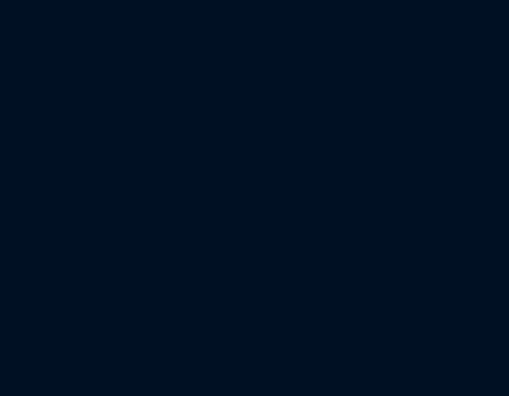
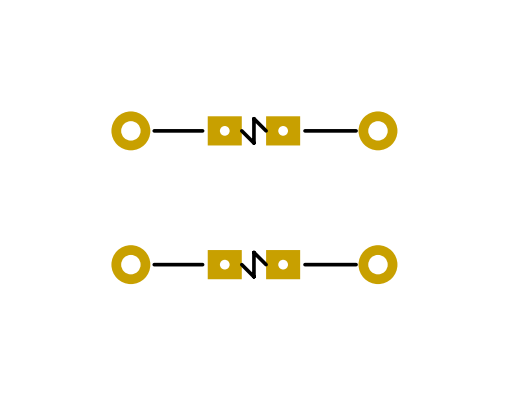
part: none -> (254, 130)
part: none -> (254, 264)

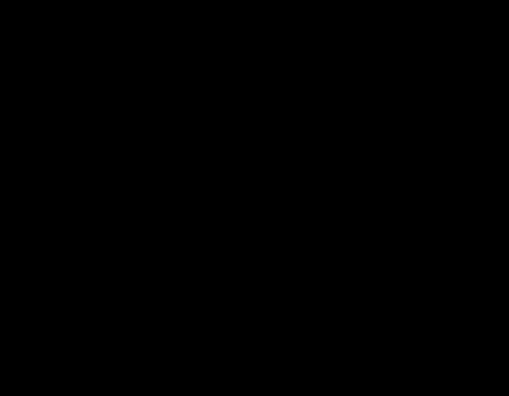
part: (254, 130) -> none
part: (254, 264) -> none

